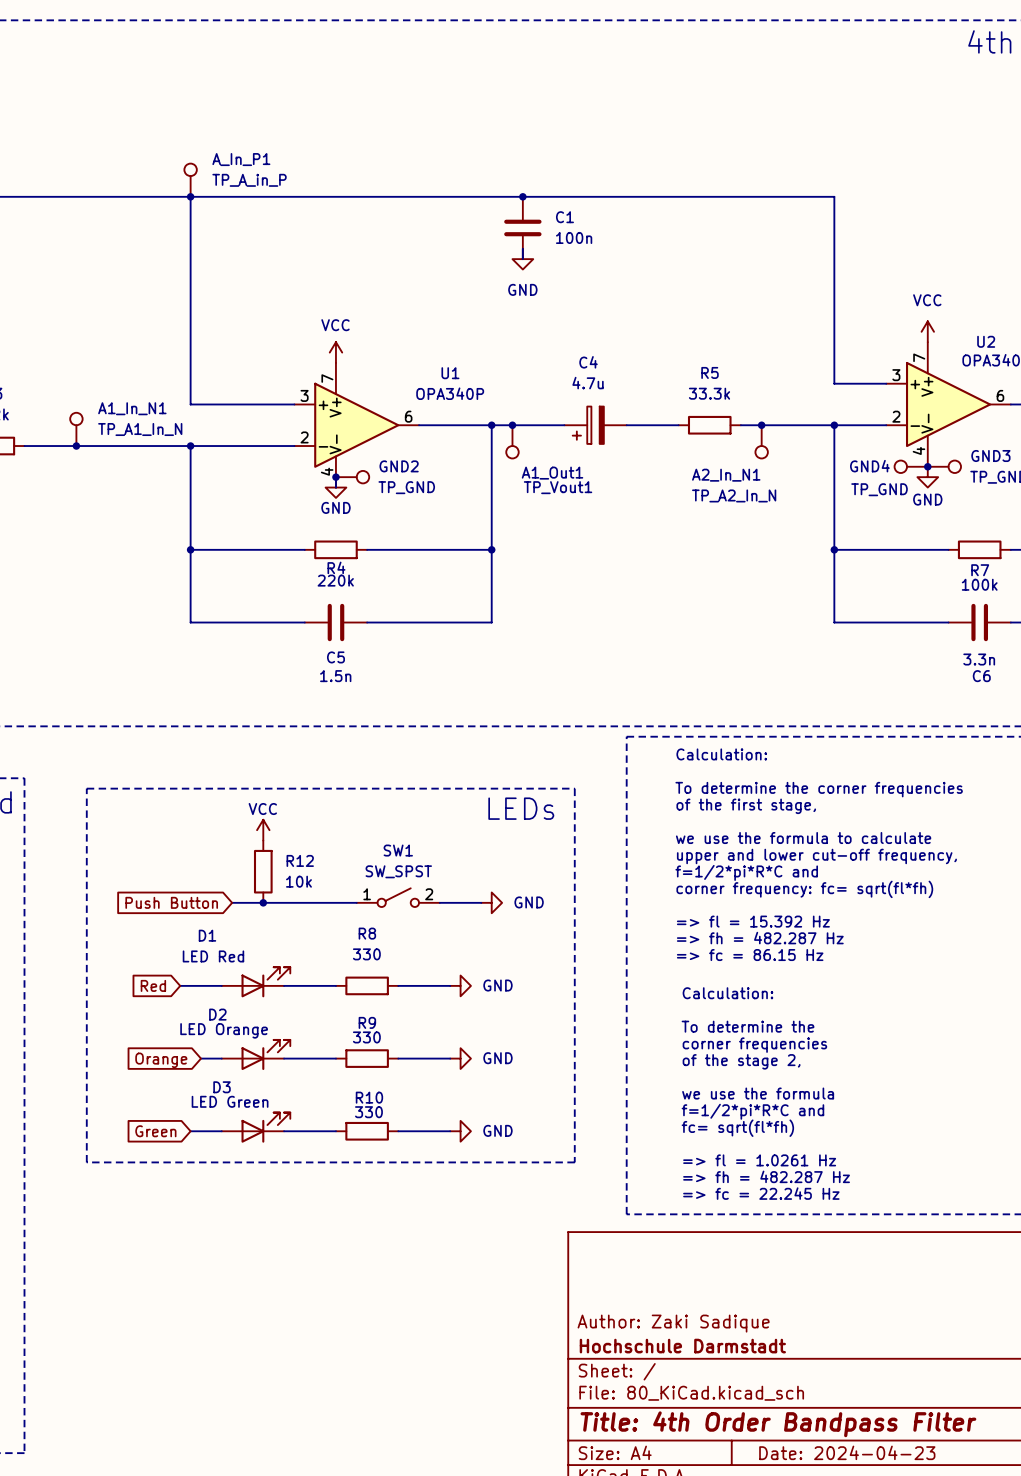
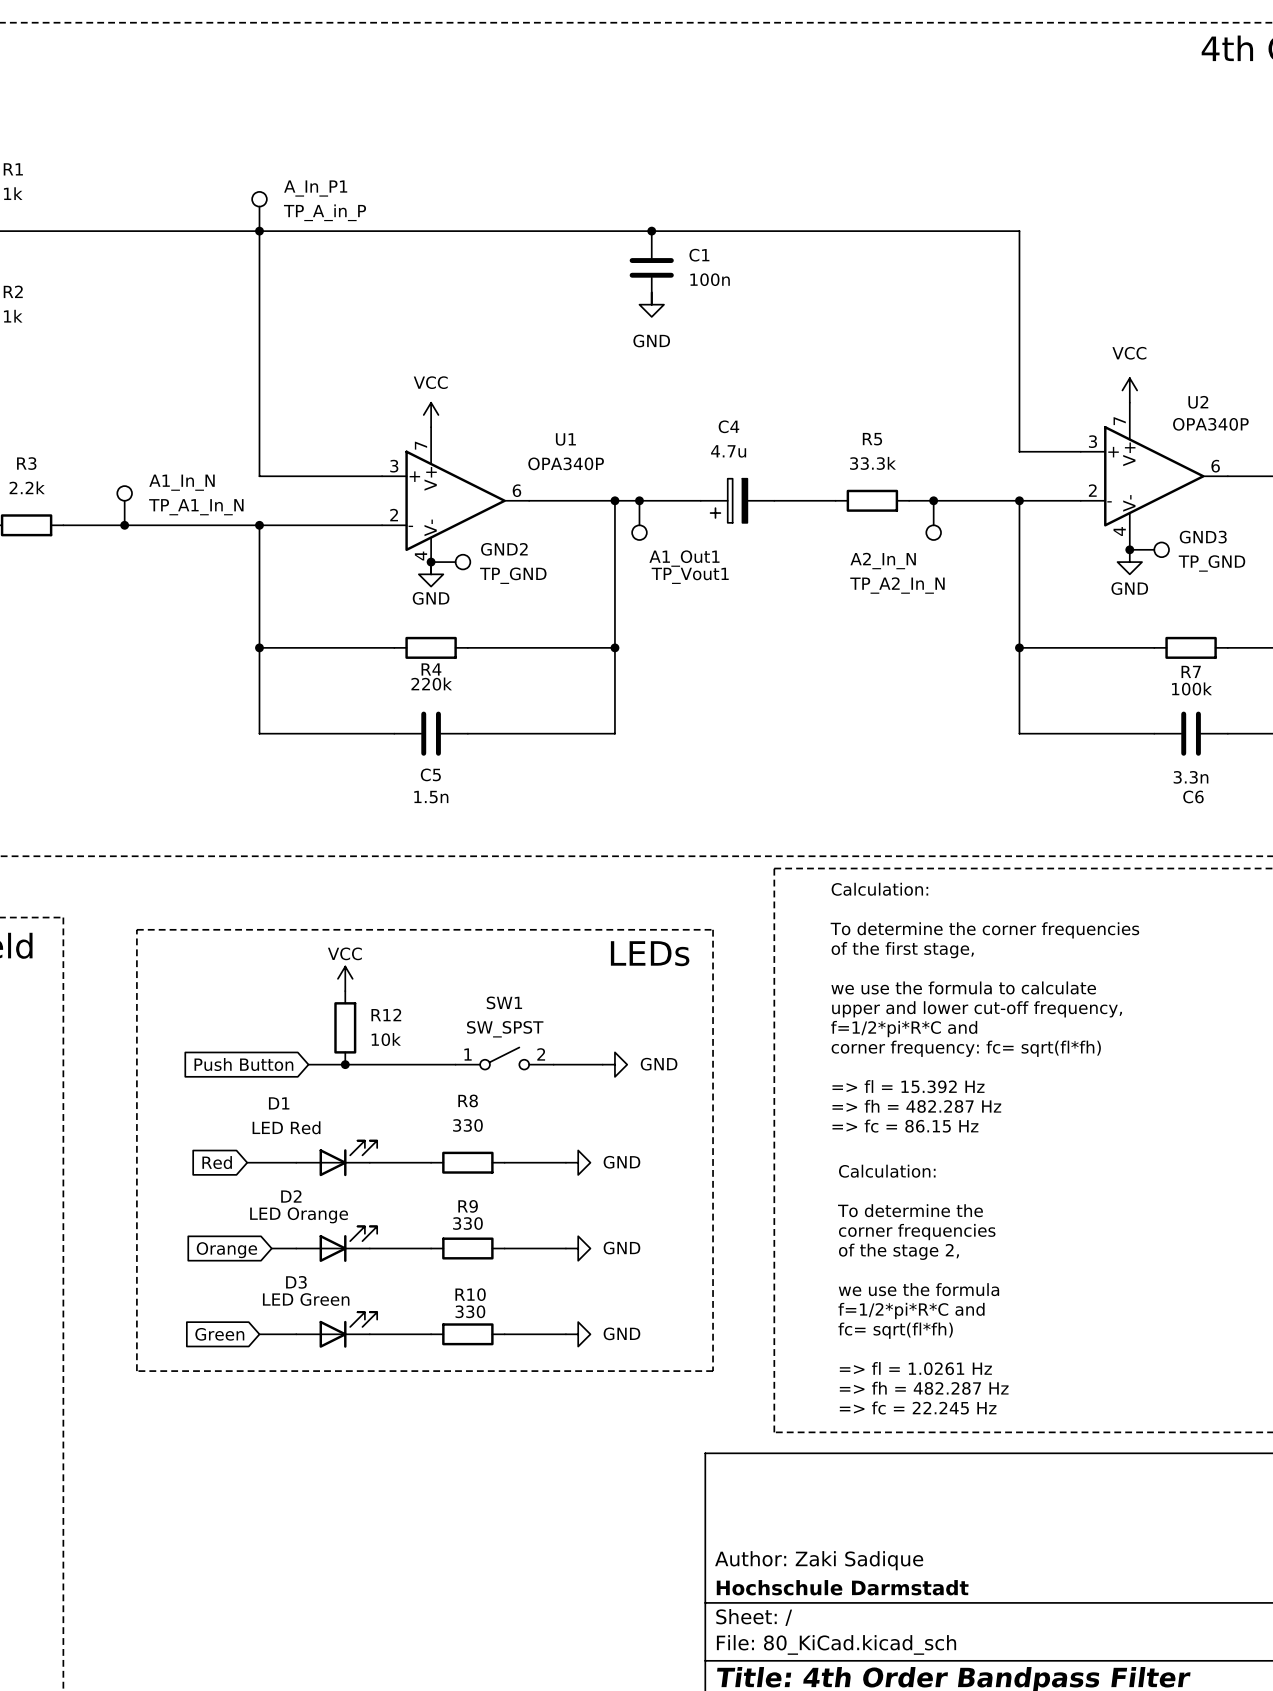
A1_In_N1 name: A1_In_N1 (132, 408) -> A1_In_N (182, 482)
GND4: TP_GND (911, 466) -> none
A2_In_N1 name: A2_In_N1 (726, 475) -> A2_In_N (883, 561)

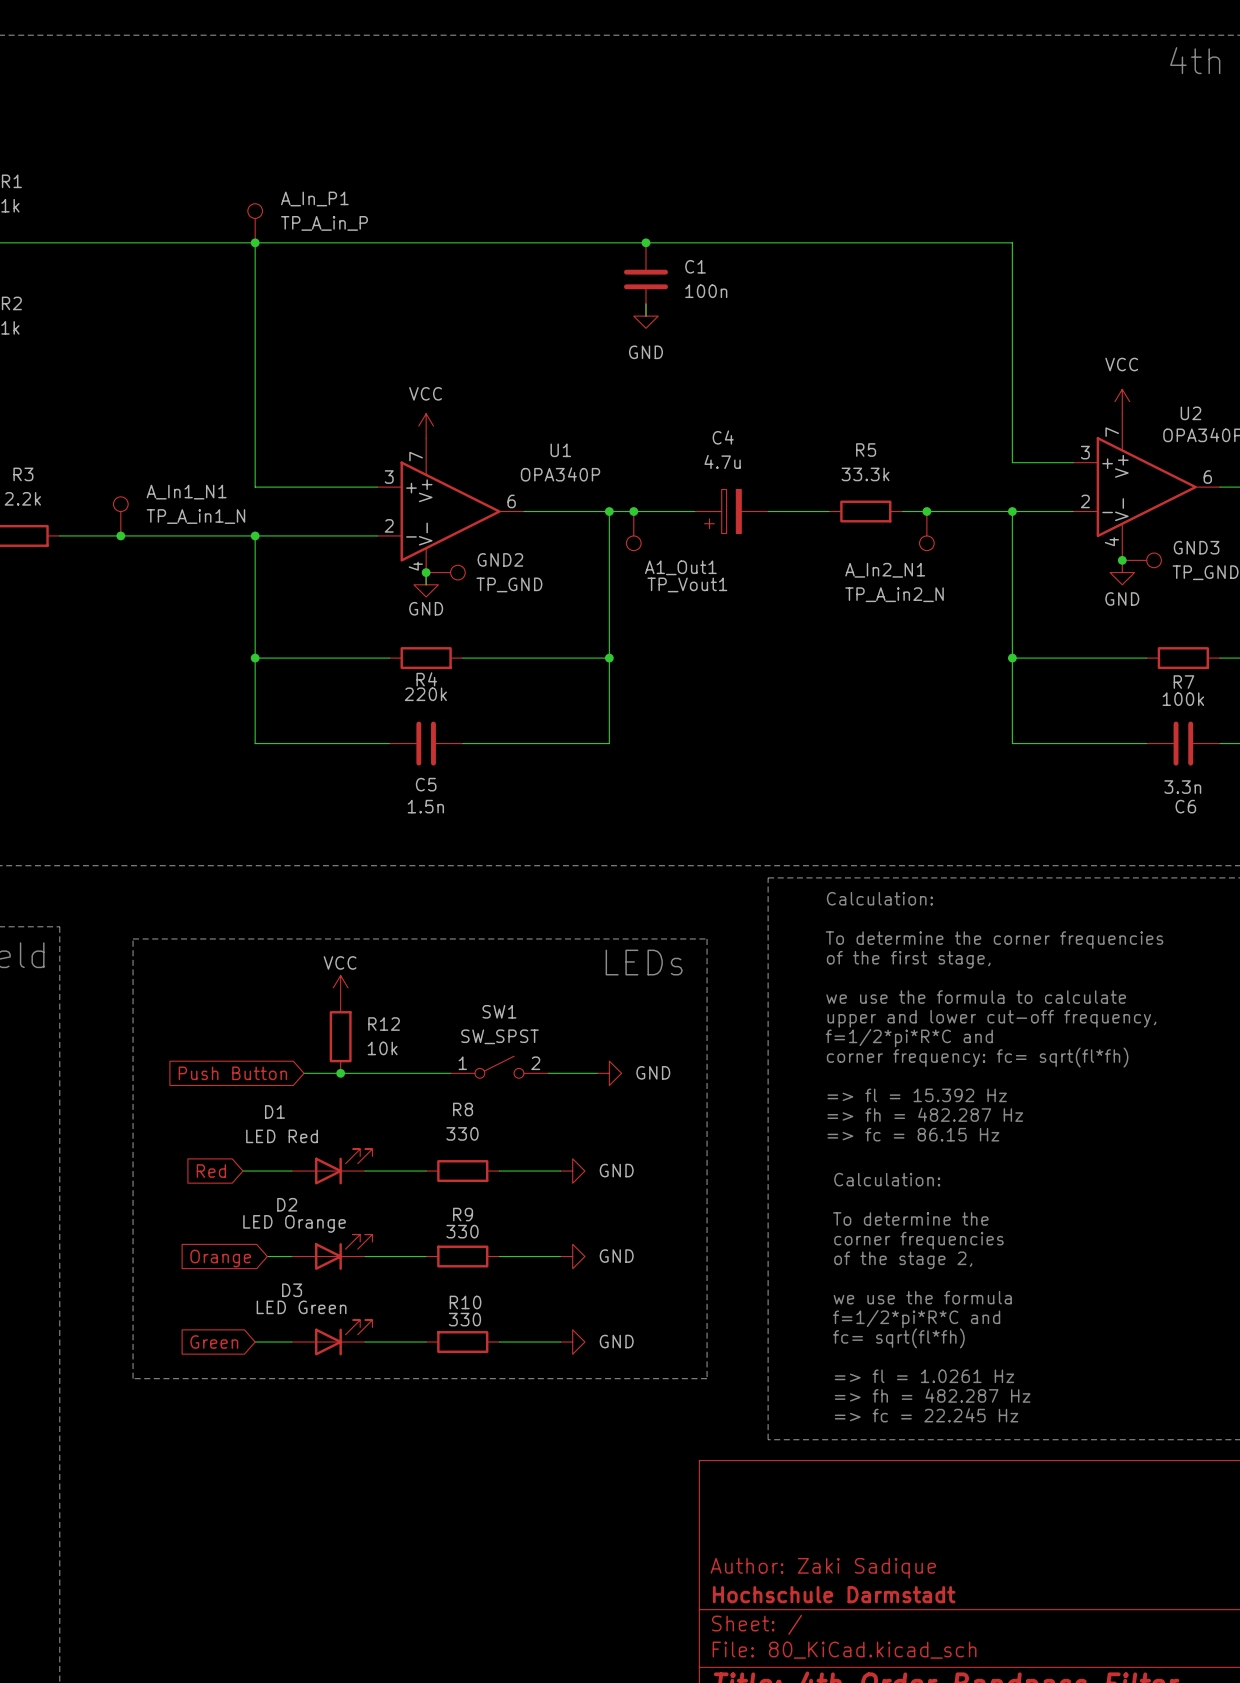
A1_In_N name: A1_In_N (182, 482) -> A_In1_N1 (186, 492)
A1_In_N value: TP_A1_In_N (196, 507) -> TP_A_in1_N (195, 516)
A2_In_N name: A2_In_N (883, 561) -> A_In2_N1 (885, 570)
A2_In_N value: TP_A2_In_N (897, 585) -> TP_A_in2_N (894, 594)

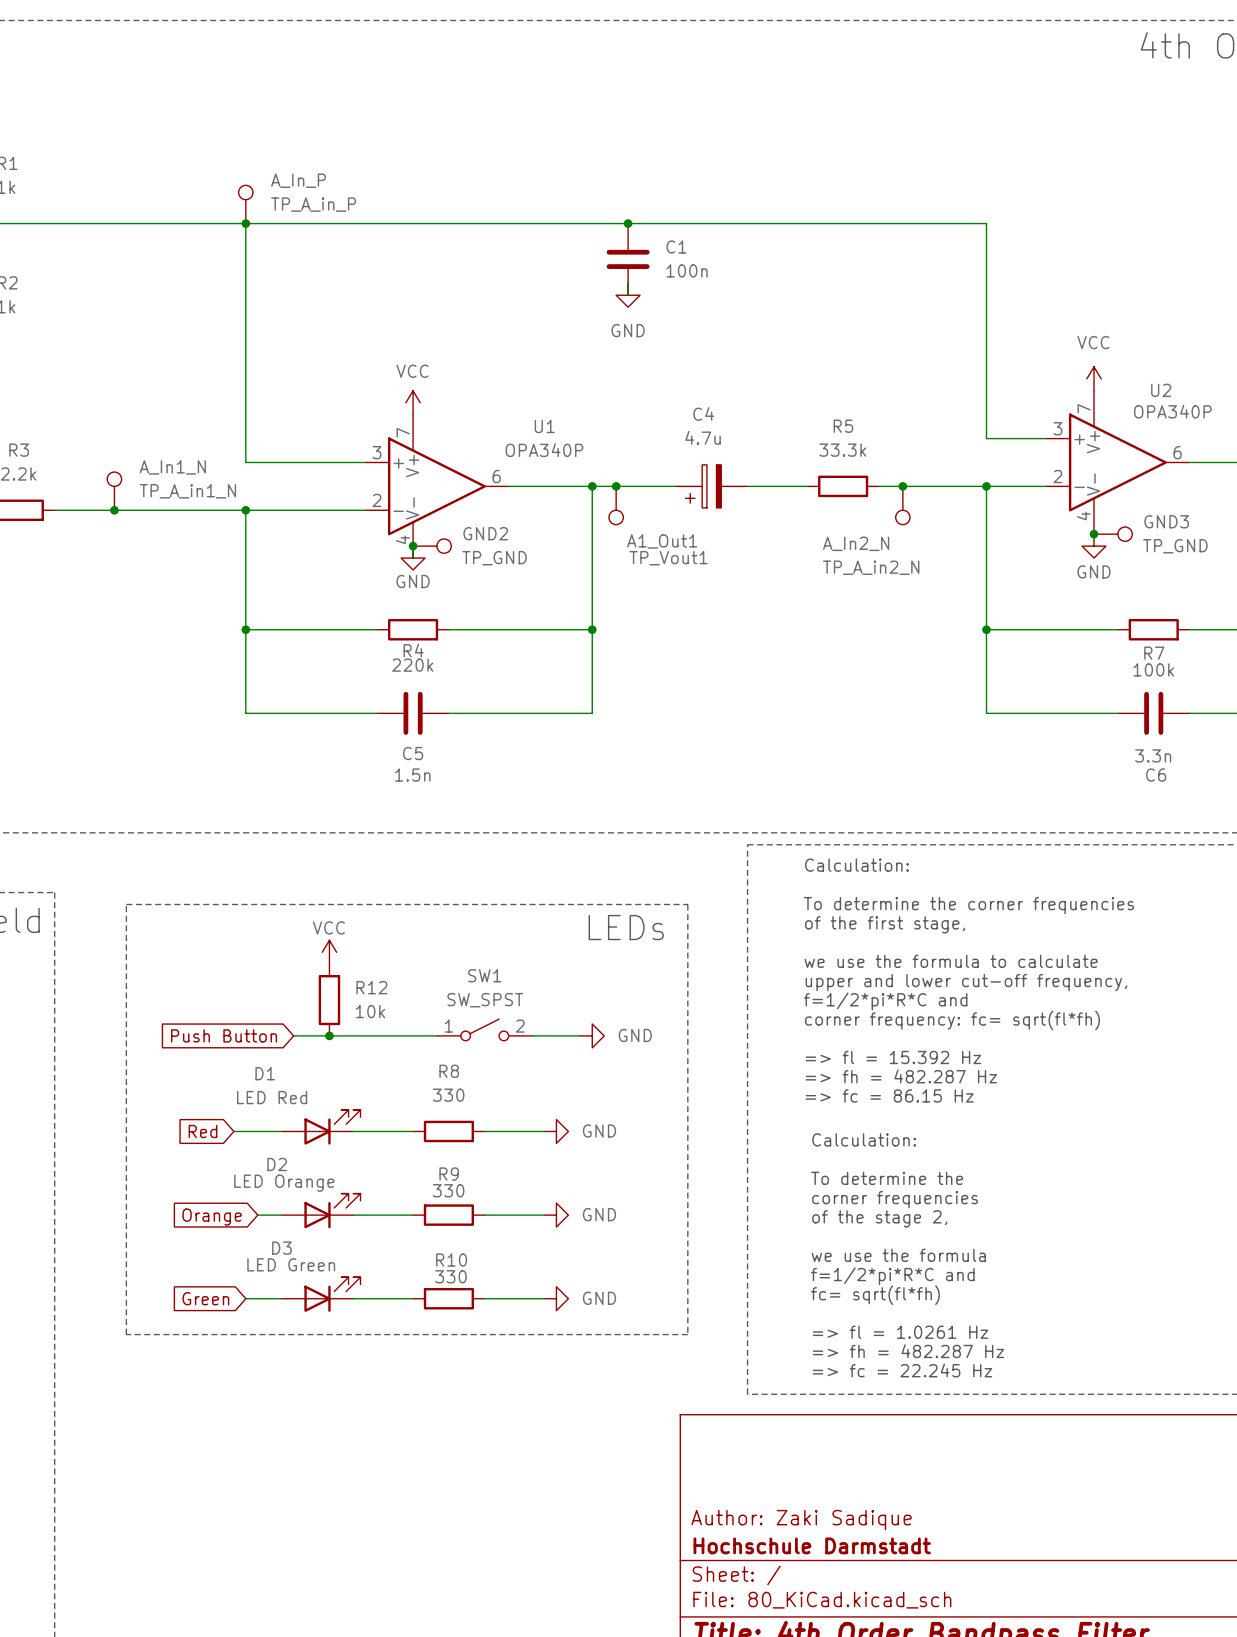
A_In_P1 name: A_In_P1 (314, 198) -> A_In_P (298, 180)
A_In1_N1 name: A_In1_N1 (186, 492) -> A_In1_N (172, 467)
A_In2_N1 name: A_In2_N1 (885, 570) -> A_In2_N (856, 543)

